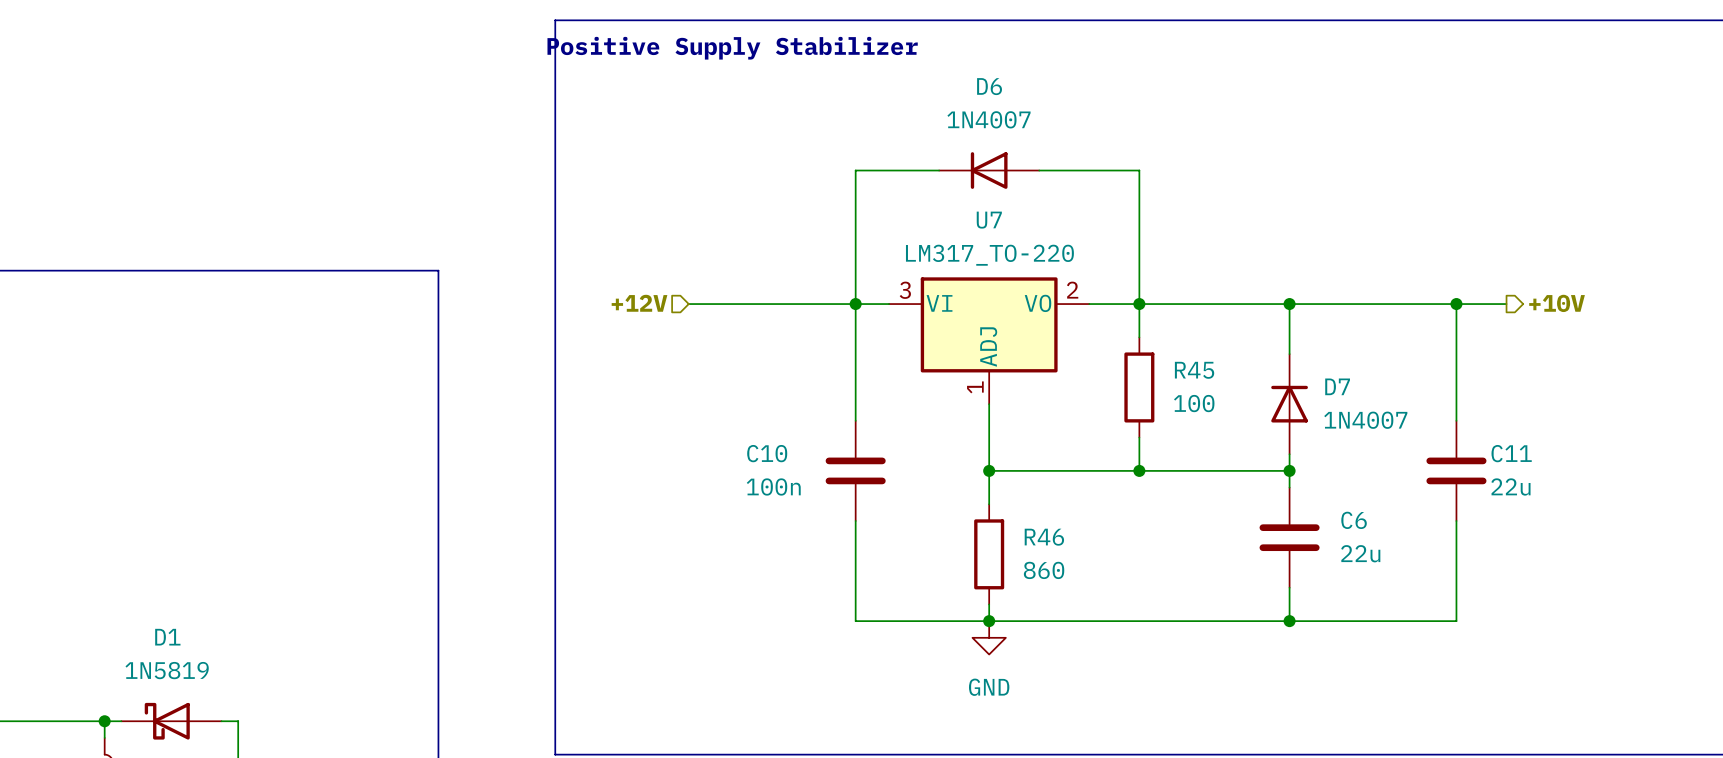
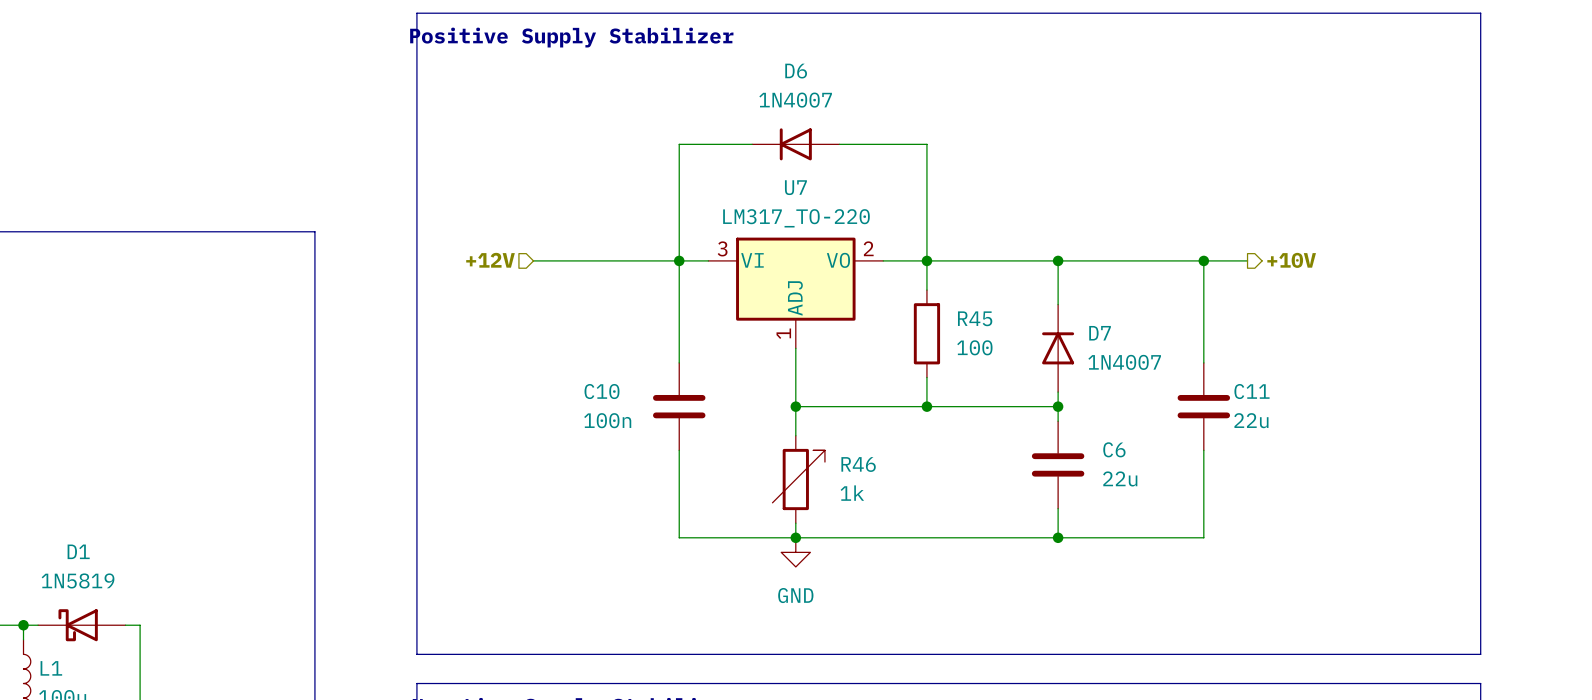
R46 symbol: [974, 504, 1005, 605] -> [772, 435, 825, 524]
R46 value: 860 (1044, 570) -> 1k (852, 493)

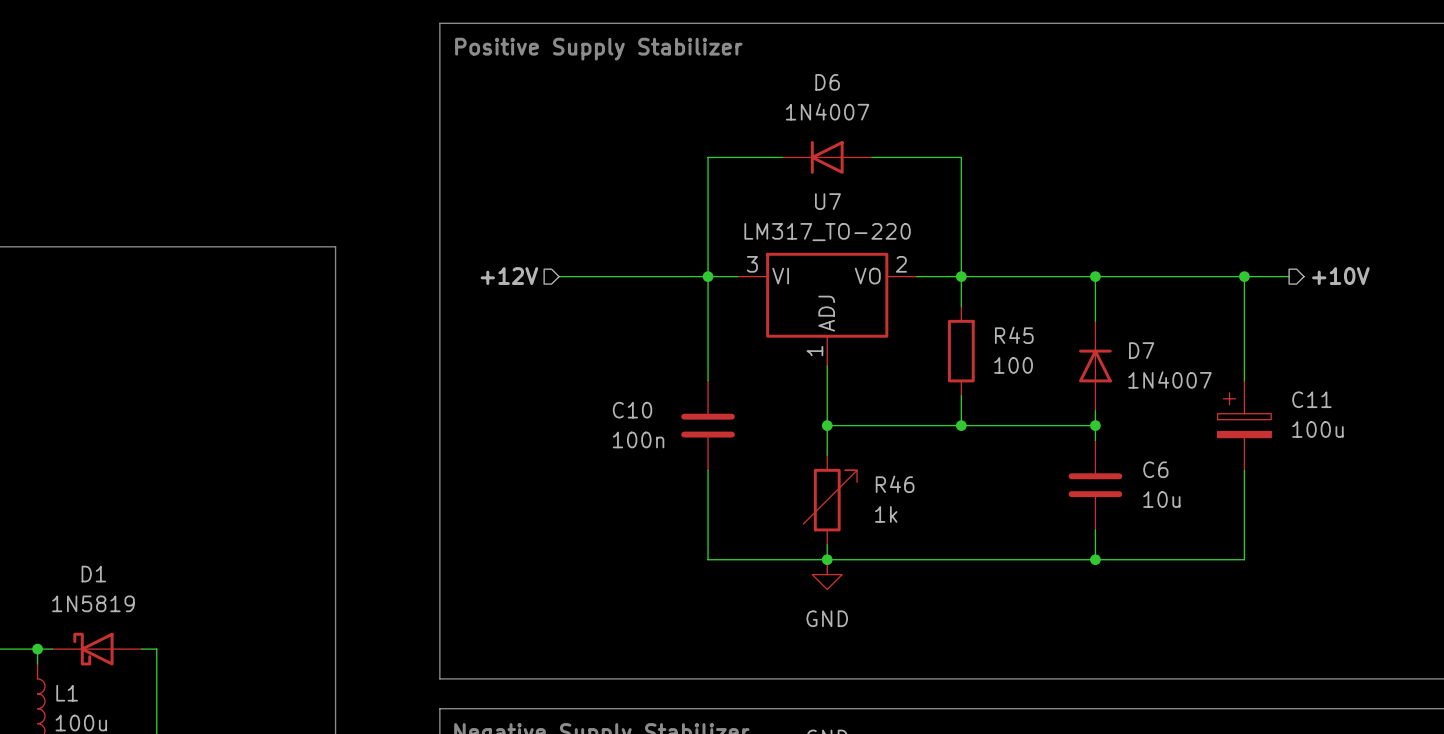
C11 symbol: [1177, 362, 1231, 451] -> [1217, 380, 1272, 471]
C11 value: 22u (1251, 420) -> 100u (1317, 429)
C6 value: 22u (1120, 478) -> 10u (1161, 499)

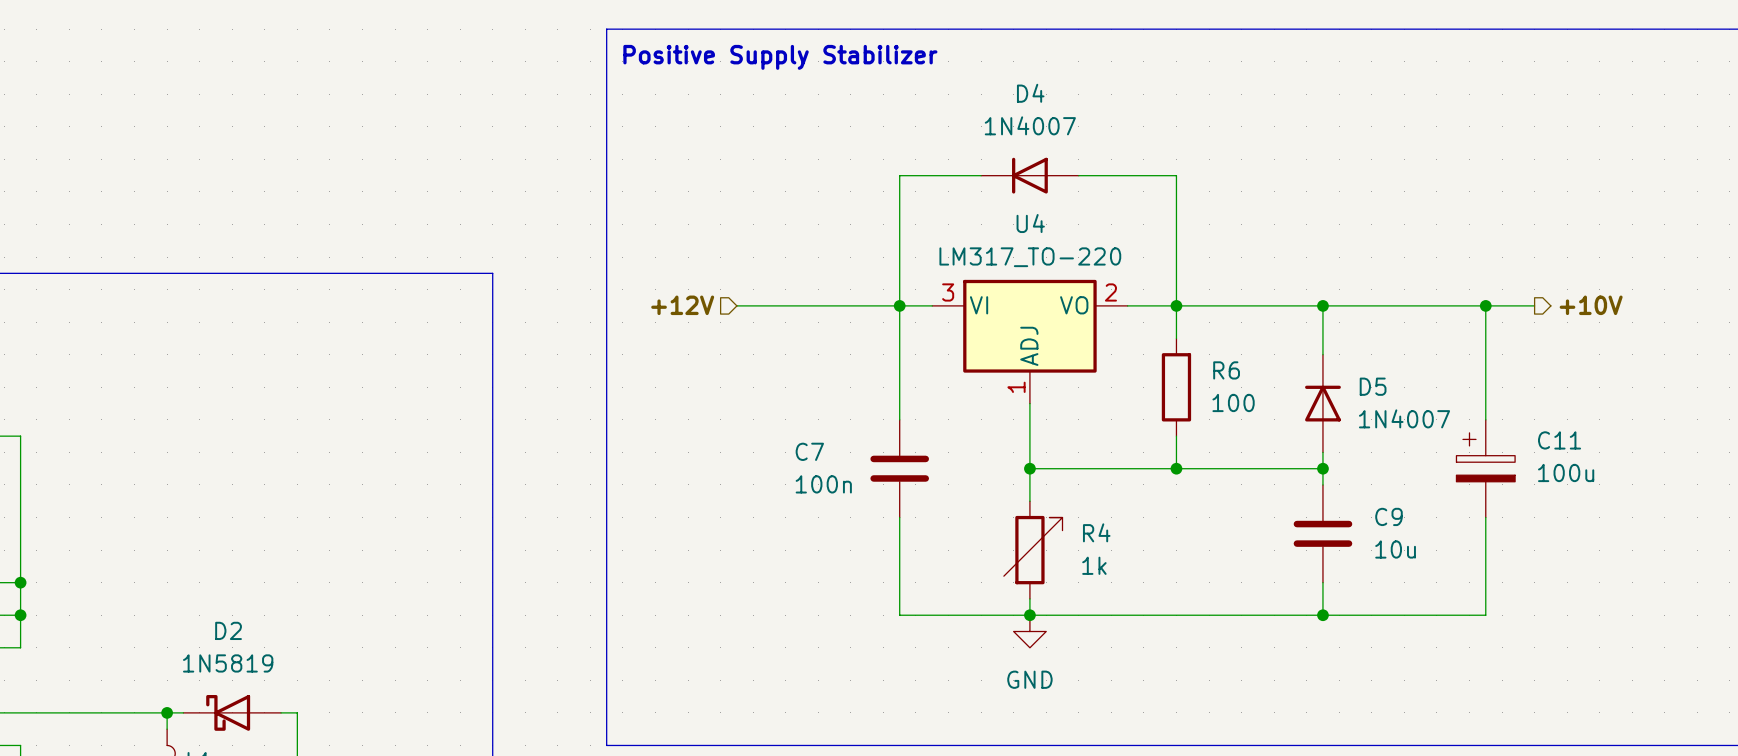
D6 name: D6 (827, 82) -> D4 (1030, 93)
U7 name: U7 (827, 201) -> U4 (1030, 223)
R45 name: R45 (1014, 335) -> R6 (1226, 370)
D7 name: D7 (1141, 350) -> D5 (1373, 386)
C10 name: C10 (632, 410) -> C7 (809, 451)
C6 name: C6 (1155, 469) -> C9 (1388, 516)
R46 name: R46 (895, 484) -> R4 (1096, 532)
D1 name: D1 (93, 574) -> D2 (228, 630)

